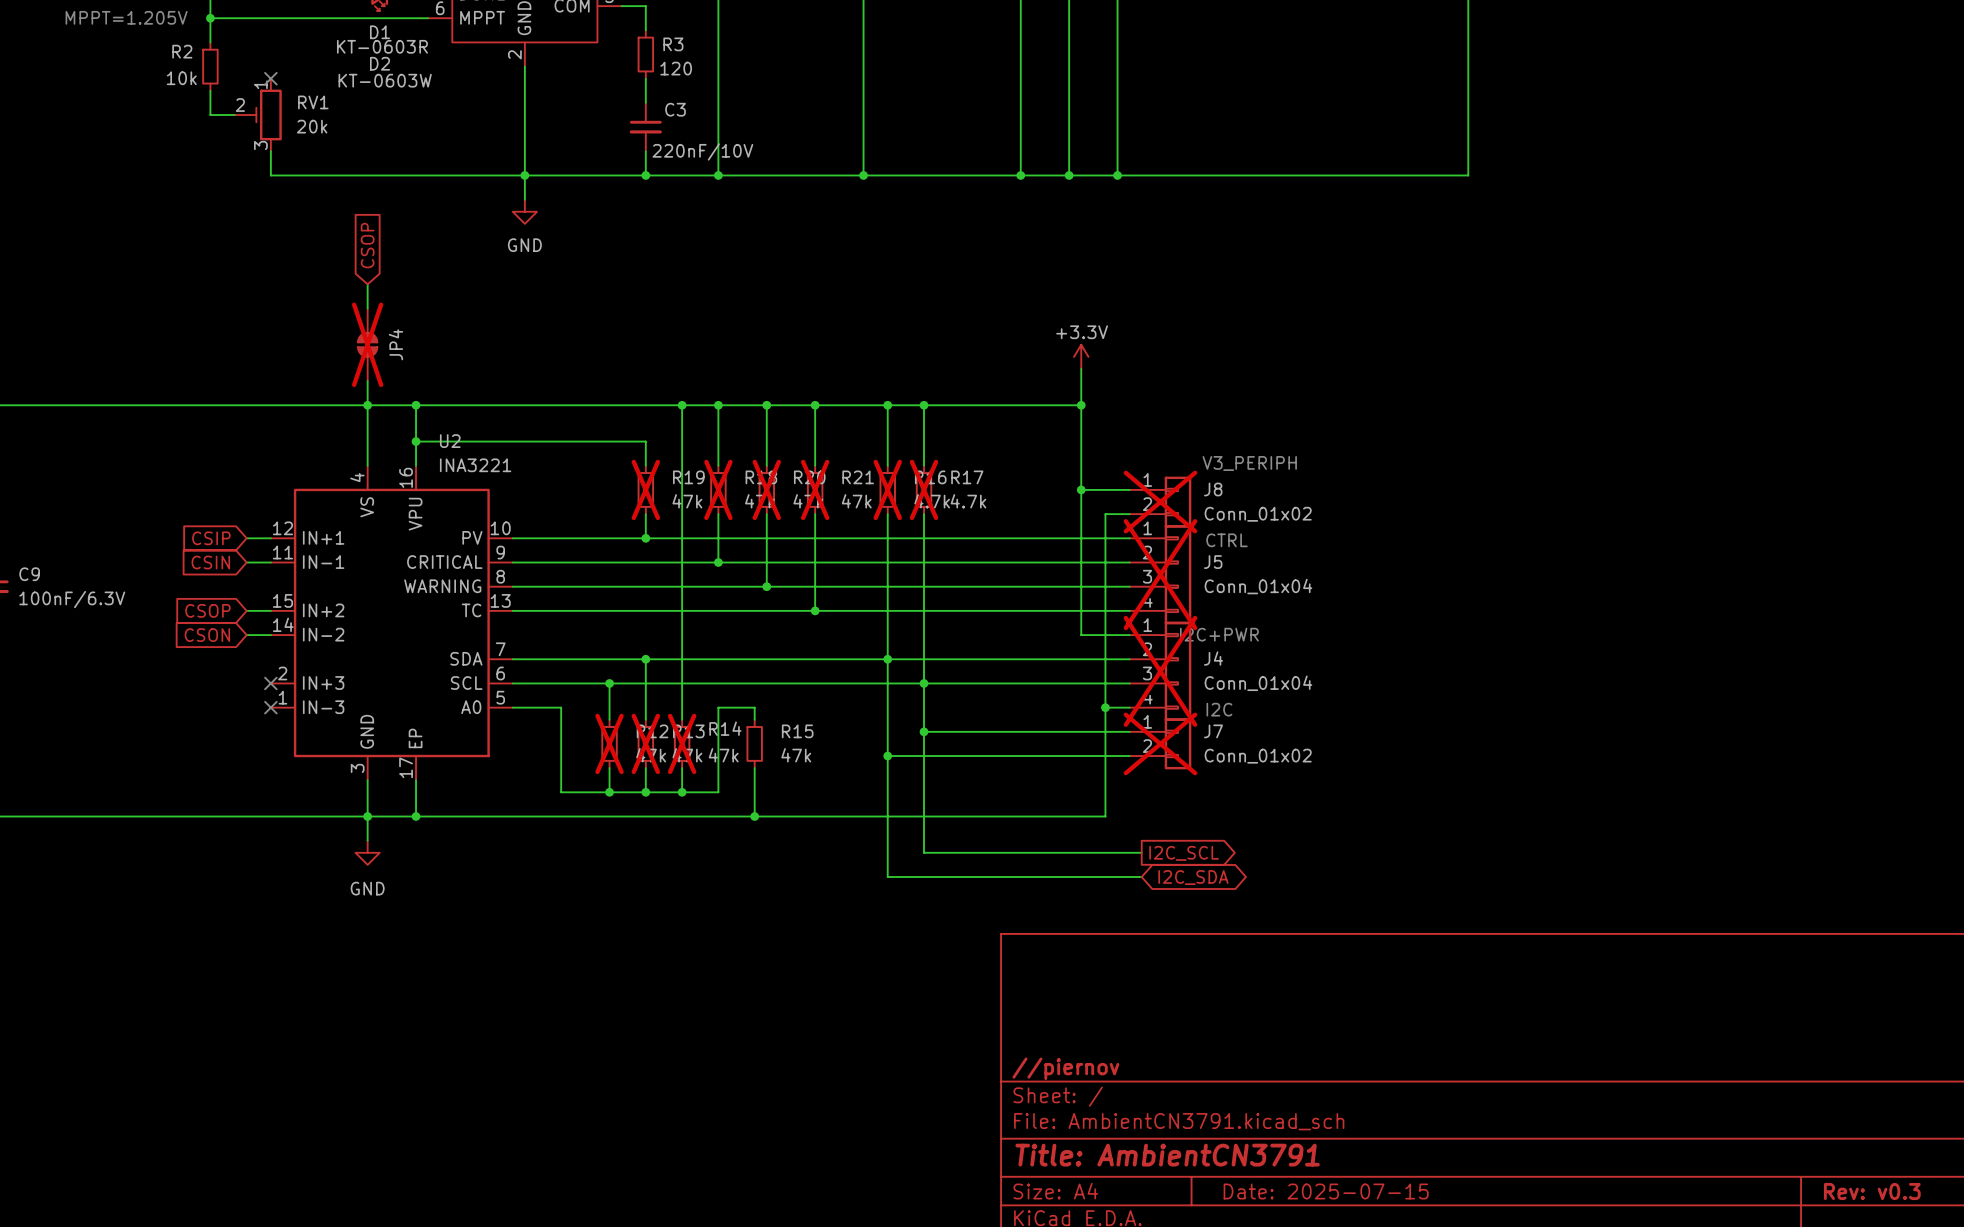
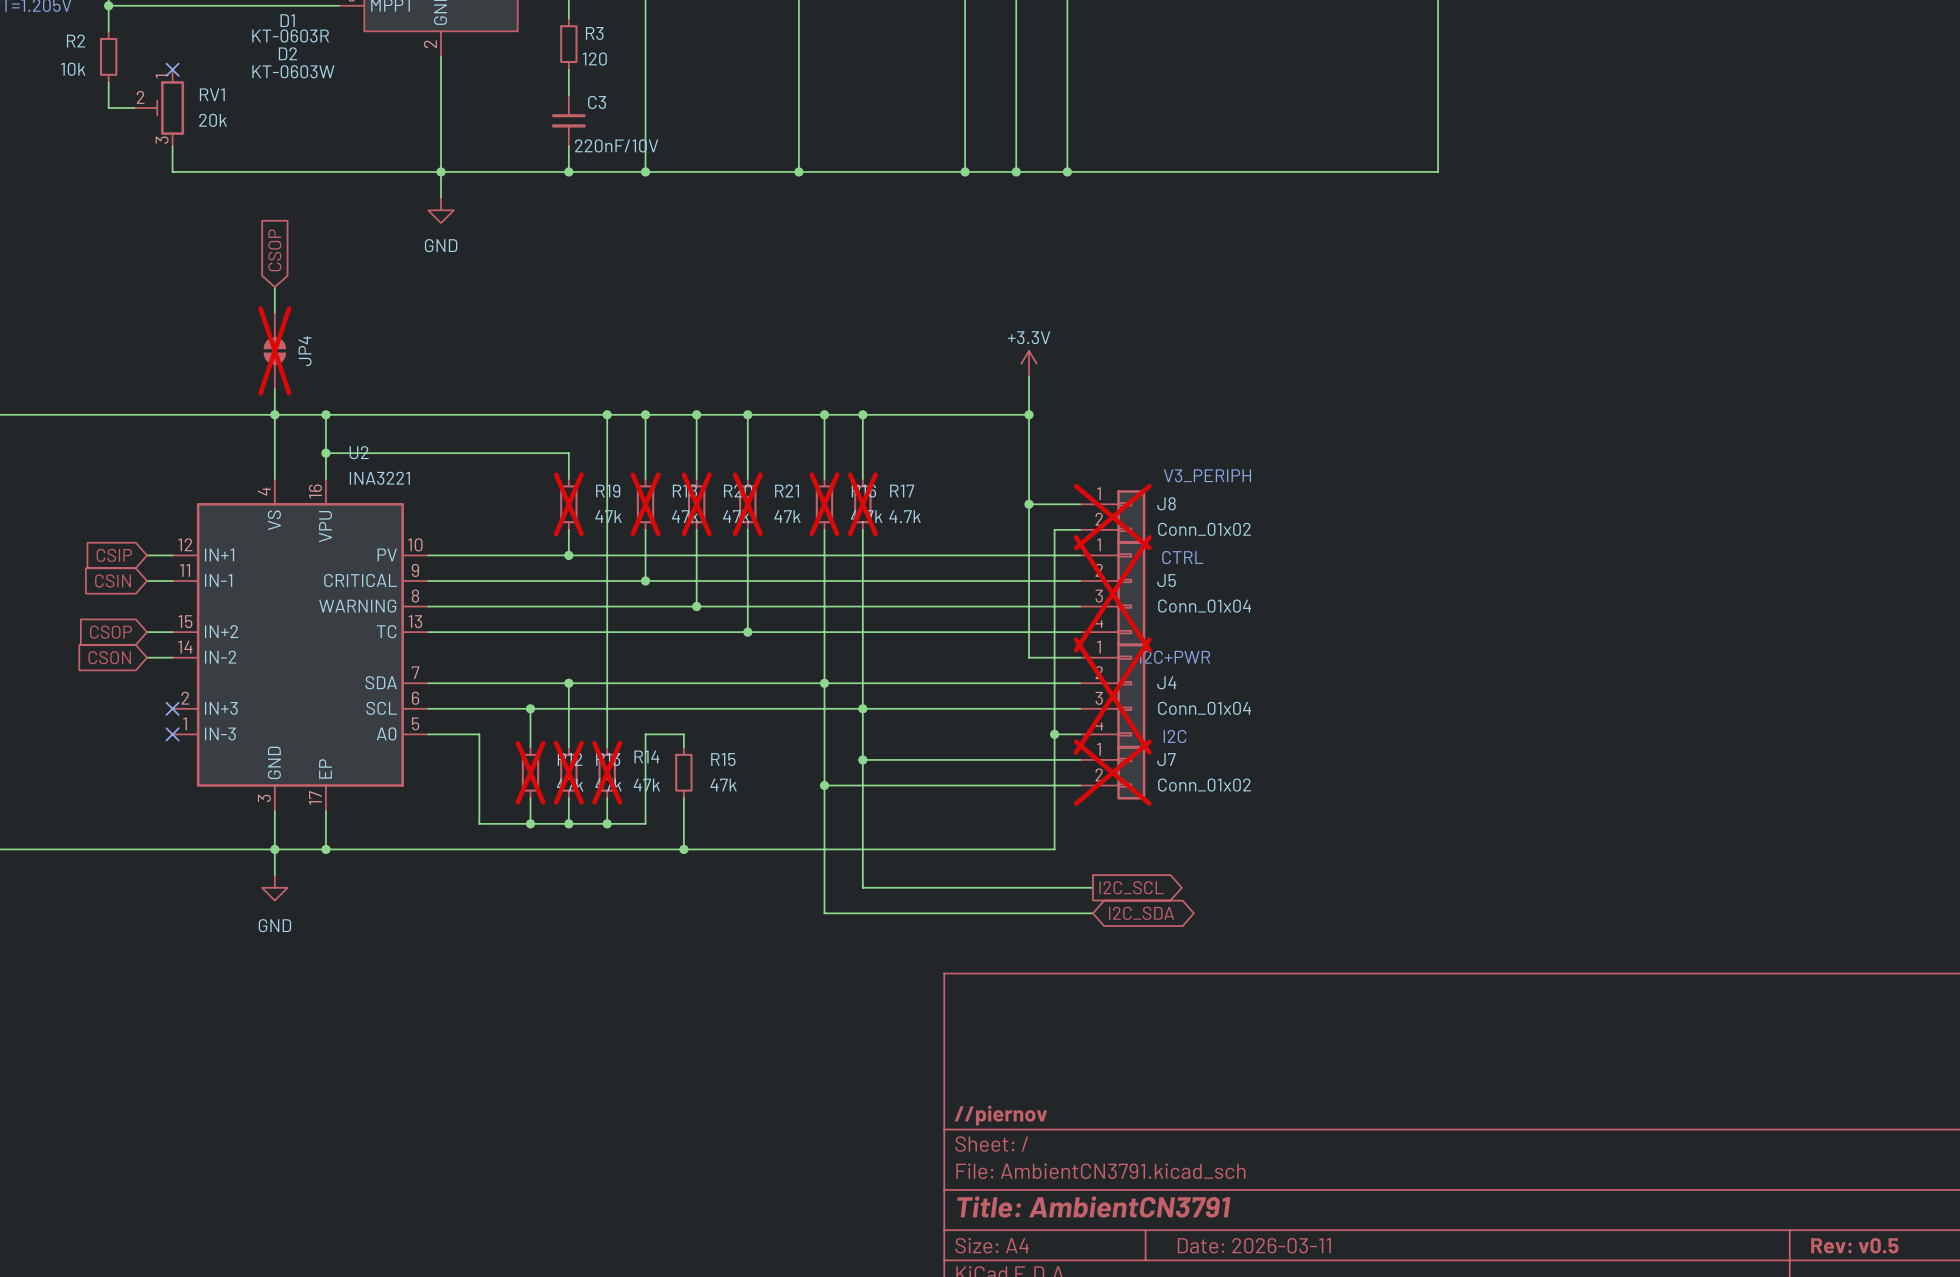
title block: Date: 2025-07-15 (1326, 1191) -> Date: 2026-03-11 (1254, 1245)
title block: Rev: v0.3 (1872, 1191) -> Rev: v0.5 (1854, 1245)

